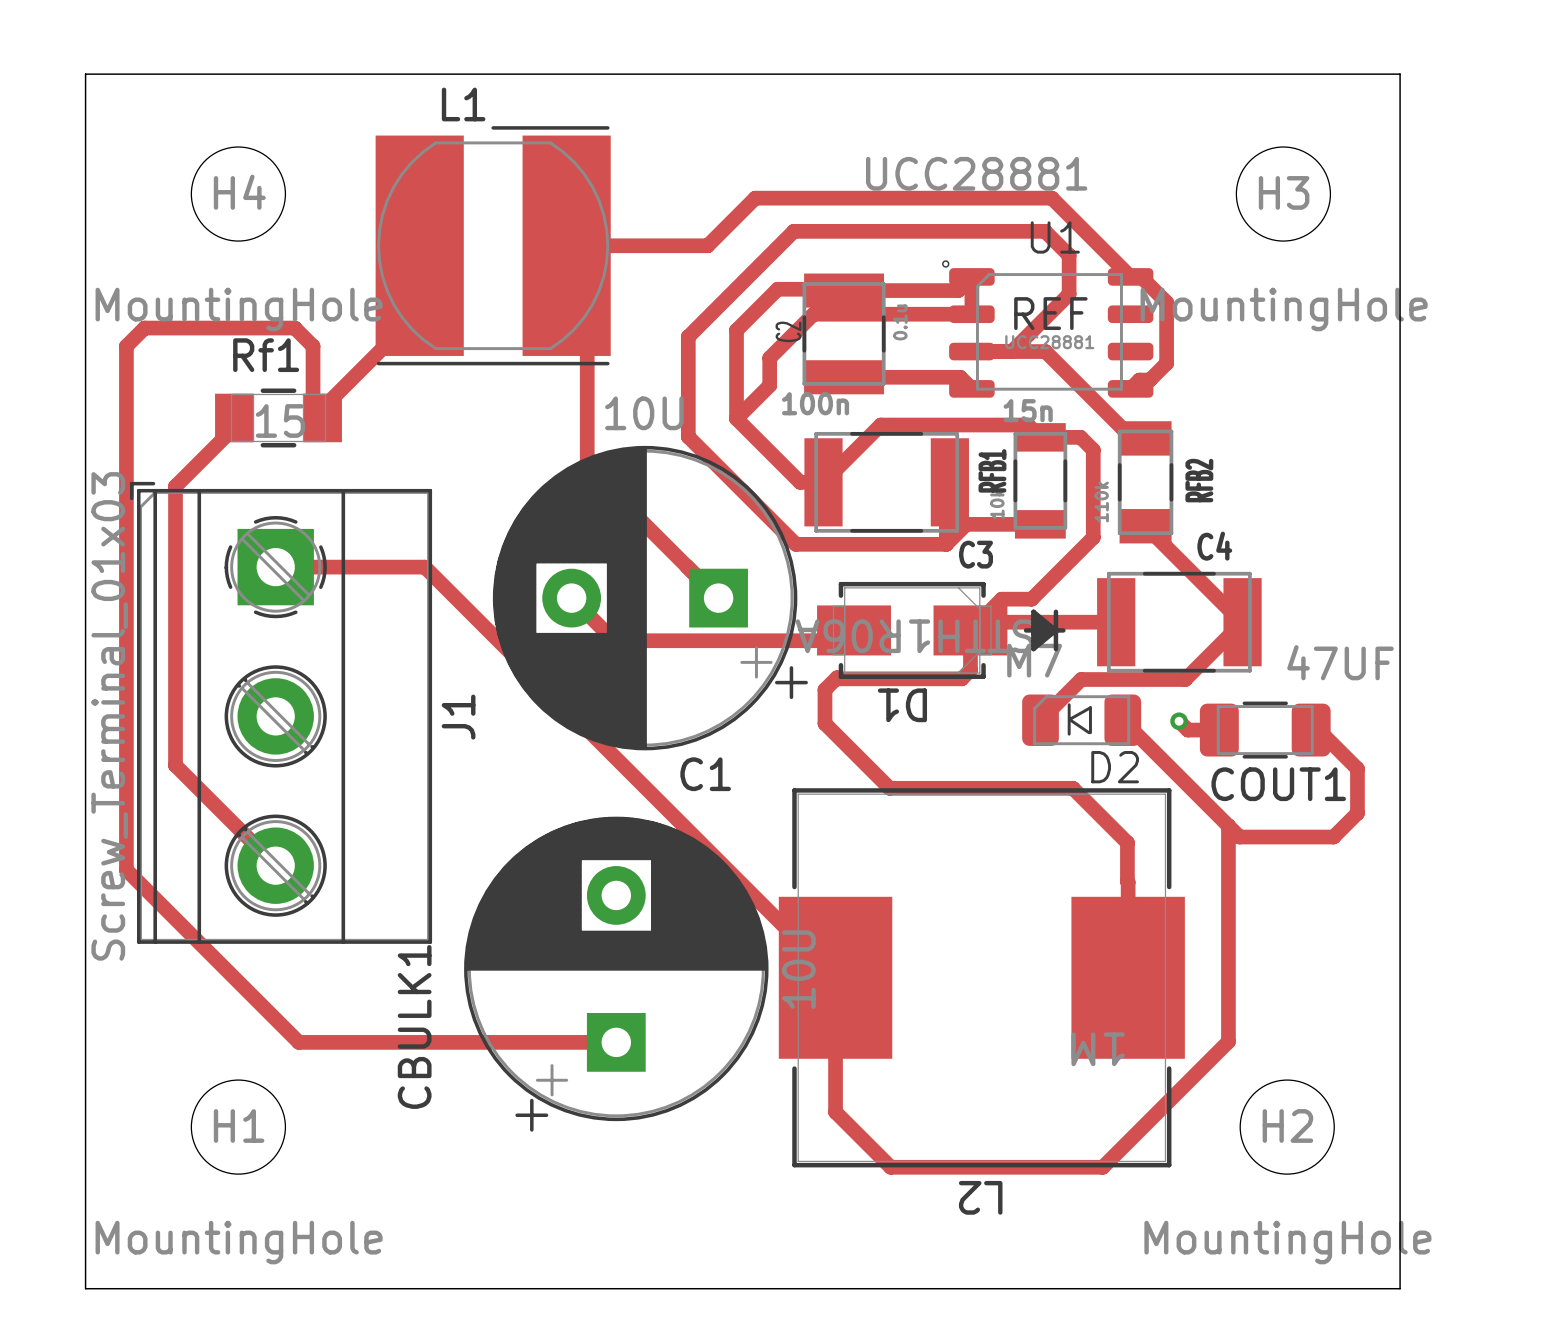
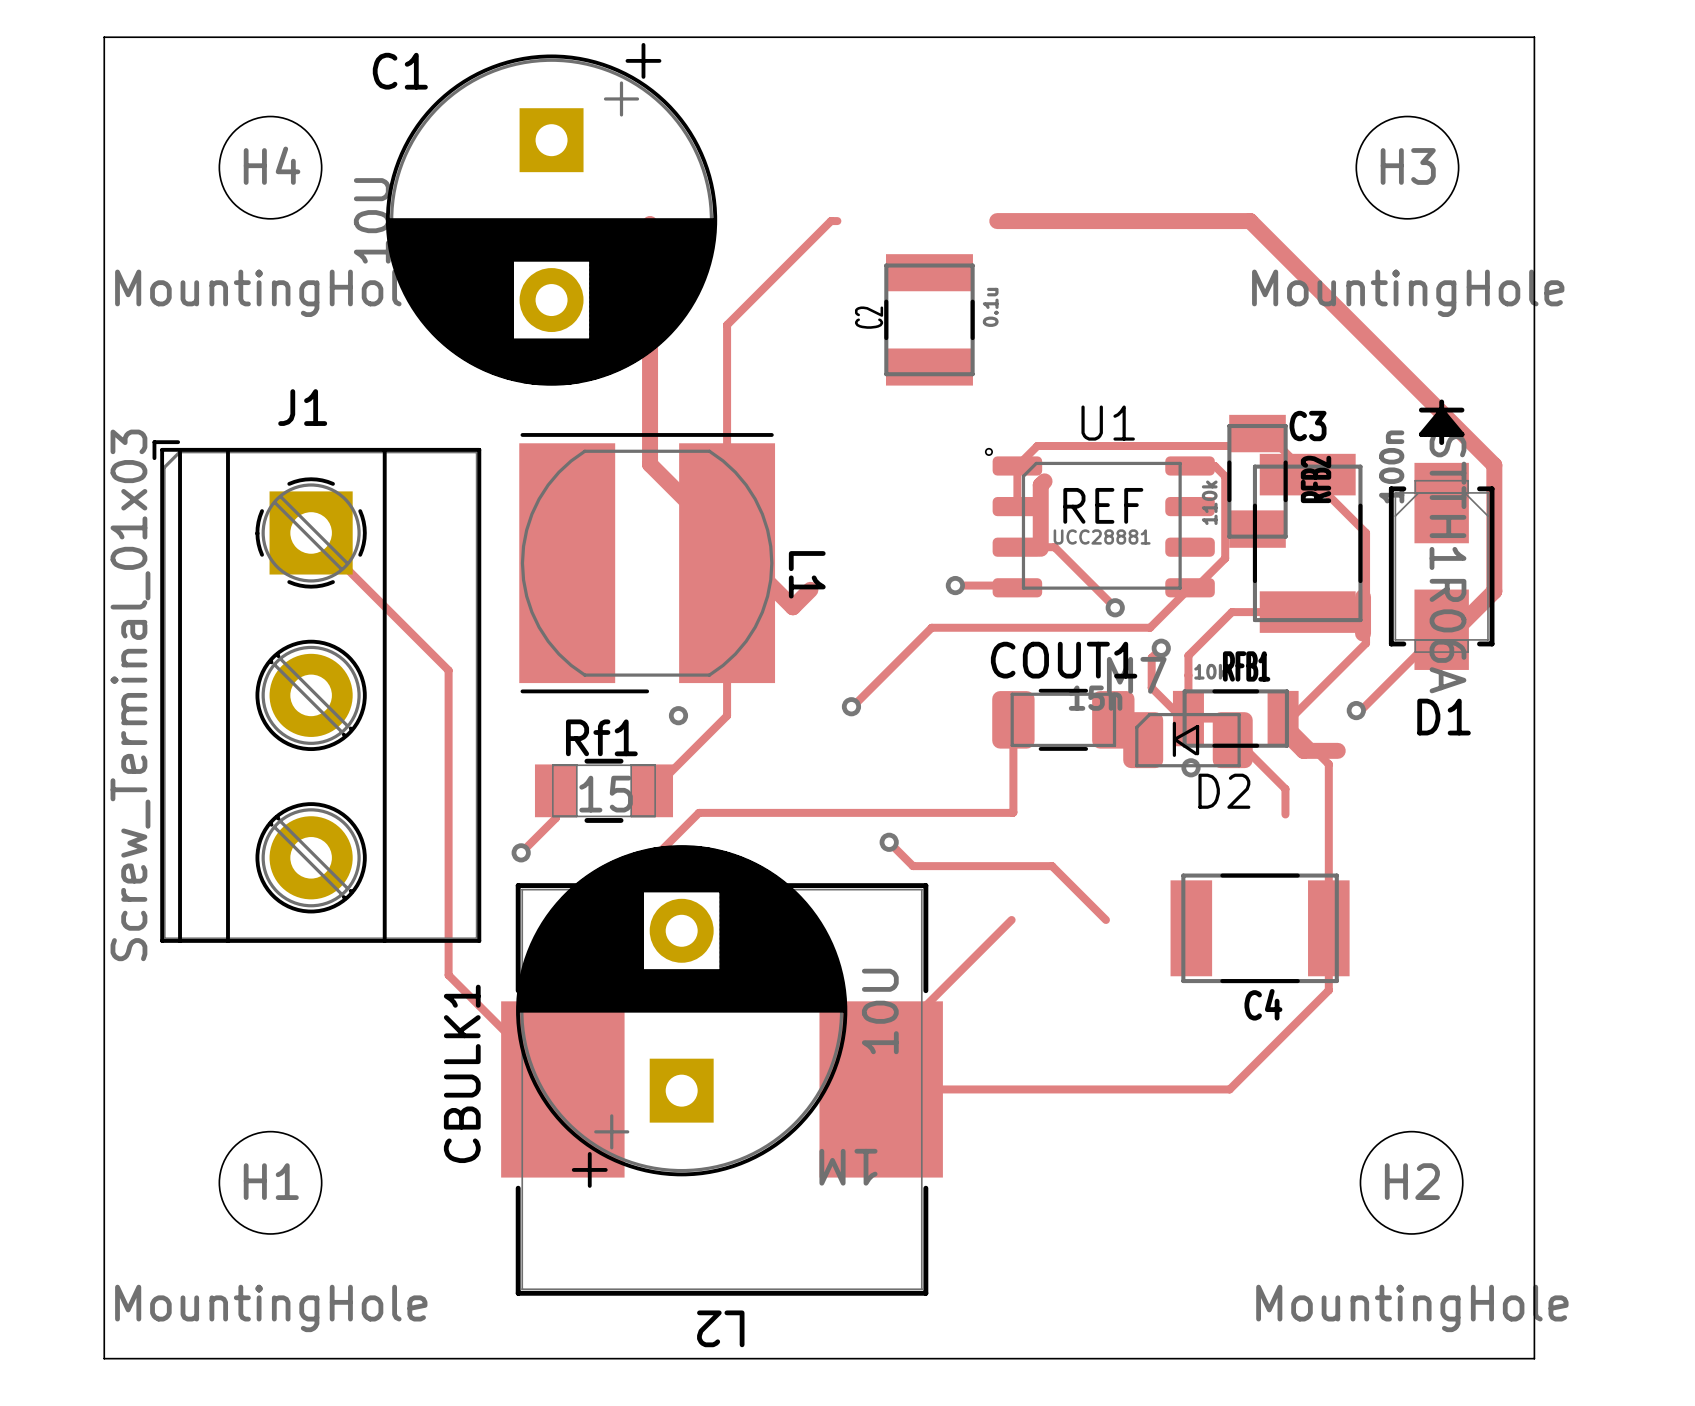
L1 name position: L1 (463, 104) -> L1 (807, 574)
U1 value: UCC28881 (976, 173) -> none
track: none -> (837, 221) (831, 221) (727, 324) (727, 715) (652, 790)
track: none -> (997, 221) (1250, 221) (1494, 465) (1494, 591) (1455, 629) (1441, 629) (1360, 710) (1356, 710)
track: (399, 245) (399, 331) (313, 417) (313, 346) (294, 328) (144, 328) (126, 346) (126, 869) (298, 1042) (616, 1042) -> none
L1 rotation: 0° (493, 245) -> 180° (647, 563)
L1 position: (493, 245) -> (647, 563)
track: (566, 245) (707, 245) (755, 198) (1051, 198) (1130, 276) (1141, 276) (1166, 302) (1166, 363) (1149, 380) (1139, 380) (1130, 388) -> none
track: (843, 289) (777, 289) (736, 330) (736, 418) -> none
track: (844, 290) (958, 290) (971, 276) (971, 314) (813, 314) (769, 358) (769, 385) (736, 418) -> none
U1 position: (1047, 329) -> (1099, 522)
track: (971, 351) (1045, 351) (1132, 438) (1145, 438) -> none
track: (1011, 351) (1069, 294) (1069, 255) (1045, 231) (793, 231) (688, 336) (688, 436) (795, 544) (946, 544) (966, 524) (1040, 524) -> none
Rf1 name position: Rf1 (266, 355) -> Rf1 (601, 737)
track: (844, 377) (960, 377) (971, 388) -> none
track: (243, 417) (175, 486) (175, 765) (275, 865) -> none
Rf1 position: (278, 417) -> (603, 790)
track: (736, 418) (800, 482) (823, 482) (880, 425) (1028, 425) (1040, 437) (1080, 437) (1093, 450) (1093, 537) (1031, 599) (1001, 599) (970, 630) (970, 670) (961, 678) (837, 677) (824, 689) (824, 723) (889, 788) (1072, 788) (1127, 842) (1128, 977) -> none
track: none -> (1190, 465) (1214, 465) (1225, 476) (1225, 558) (1195, 587) (1190, 587) (1150, 627) (931, 627) (851, 706)
RFB1 rotation: 0° (1040, 480) -> 90° clockwise (1235, 718)
RFB1 position: (1040, 480) -> (1235, 718)
C3 rotation: 0° (886, 482) -> 90° clockwise (1307, 543)
C3 position: (886, 482) -> (1307, 543)
track: none -> (1017, 506) (1017, 465) (1037, 446) (1279, 446) (1366, 532) (1366, 643) (1290, 718) (1283, 718) (1328, 764) (1328, 990) (1229, 1089) (881, 1089) (881, 1050) (1011, 919)
track: (1145, 526) (1242, 622) (1185, 679) (1081, 679) (1040, 720) -> none
track: none -> (311, 532) (448, 670) (448, 975) (562, 1089) (562, 948) (698, 812) (1012, 812) (1013, 719)
track: none -> (1017, 547) (1054, 547) (1115, 607)
C4 name position: C4 (1214, 546) -> C4 (1263, 1004)
C3 name position: C3 (976, 554) -> C3 (1308, 426)
track: (275, 567) (424, 567) (835, 977) (835, 1112) (890, 1167) (1102, 1167) (1228, 1041) (1228, 825) -> none
track: none -> (955, 585) (1015, 585) (1017, 587)
via: none -> (955, 585)
track: (571, 598) (614, 640) (843, 640) (854, 630) -> none
C1 rotation: 0° (650, 598) -> 90° counterclockwise (551, 214)
C1 position: (650, 598) -> (551, 214)
via: none -> (1115, 607)
track: none -> (1308, 613) (1231, 612) (1188, 655) (1188, 718)
track: (978, 622) (1116, 622) -> none
C4 position: (1179, 622) -> (1260, 928)
D1 rotation: 0° (941, 630) -> 90° counterclockwise (1441, 534)
D1 position: (941, 630) -> (1441, 534)
track: none -> (1161, 648) (1151, 657) (1151, 687) (1182, 718) (1214, 718) (1285, 789) (1285, 814)
via: none -> (1161, 648)
COUT1 value: 47UF (1340, 662) -> none
via: none -> (851, 706)
via: none -> (1356, 710)
via: none -> (678, 715)
D1 name position: D1 (902, 705) -> D1 (1444, 717)
J1 position: (281, 712) -> (316, 691)
J1 name rotation: 0° (458, 717) -> 90° clockwise (302, 407)
J1 name position: J1 (458, 717) -> J1 (302, 407)
track: (1122, 720) (1239, 837) (1333, 837) (1357, 813) (1357, 768) (1318, 730) (1311, 730) -> none
via: (1179, 721) -> none
COUT1 position: (1265, 730) -> (1063, 719)
via: none -> (1191, 767)
track: none -> (555, 790) (555, 818) (521, 852)
C1 name position: C1 (705, 774) -> C1 (400, 71)
COUT1 name position: COUT1 (1278, 784) -> COUT1 (1064, 660)
track: none -> (889, 842) (913, 866) (1052, 866) (1105, 919)
via: none -> (889, 842)
via: none -> (521, 852)
L2 position: (981, 977) -> (722, 1089)

